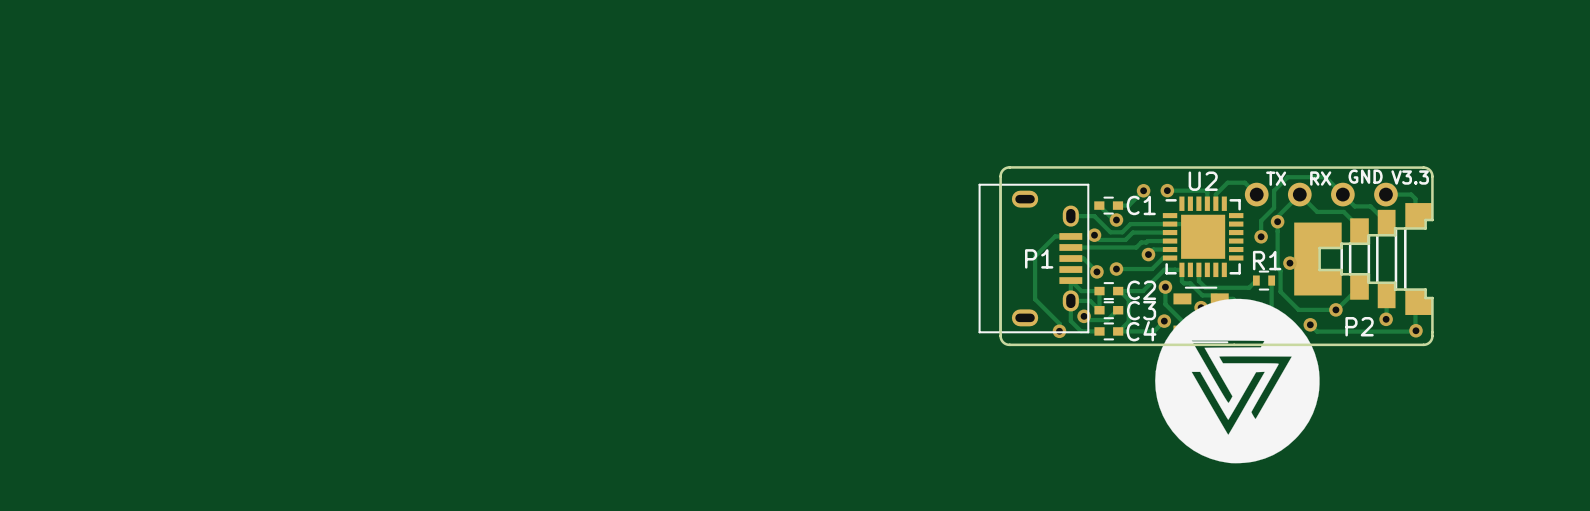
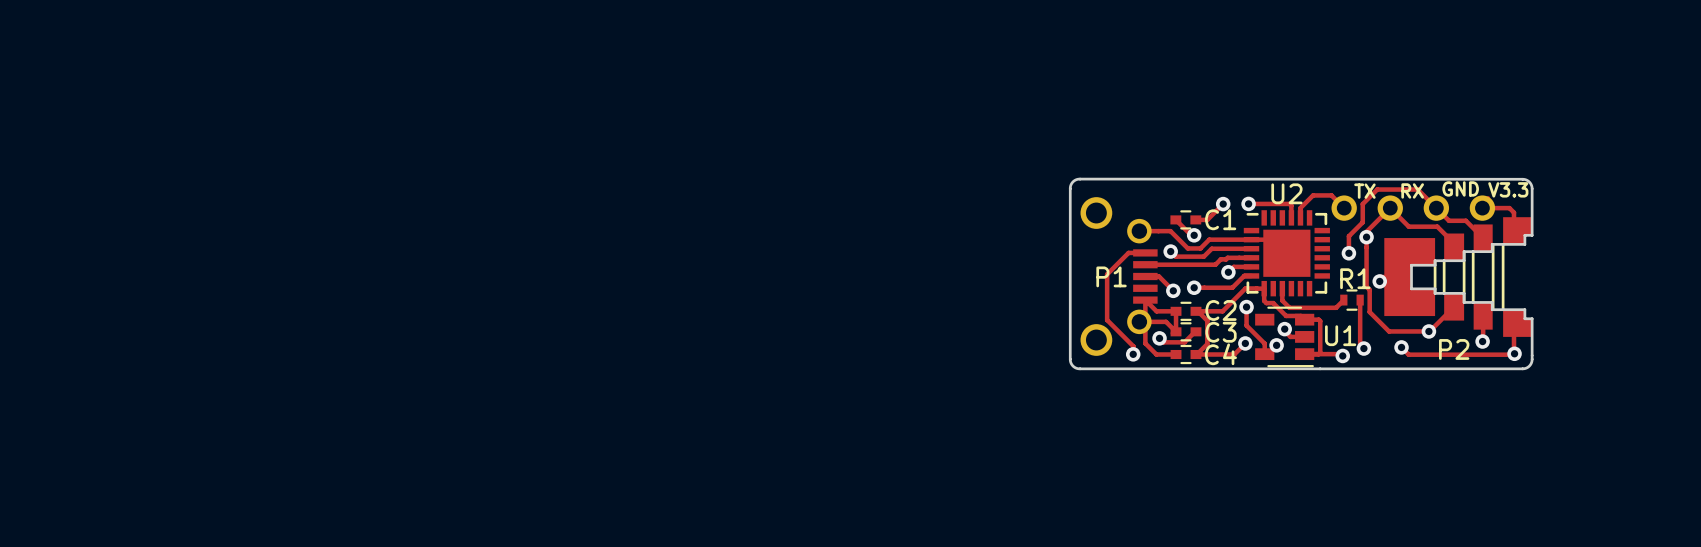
P1 footprint: [978, 183, 1090, 334] -> [1080, 197, 1158, 356]
drawing: [1155, 298, 1320, 464] -> none

